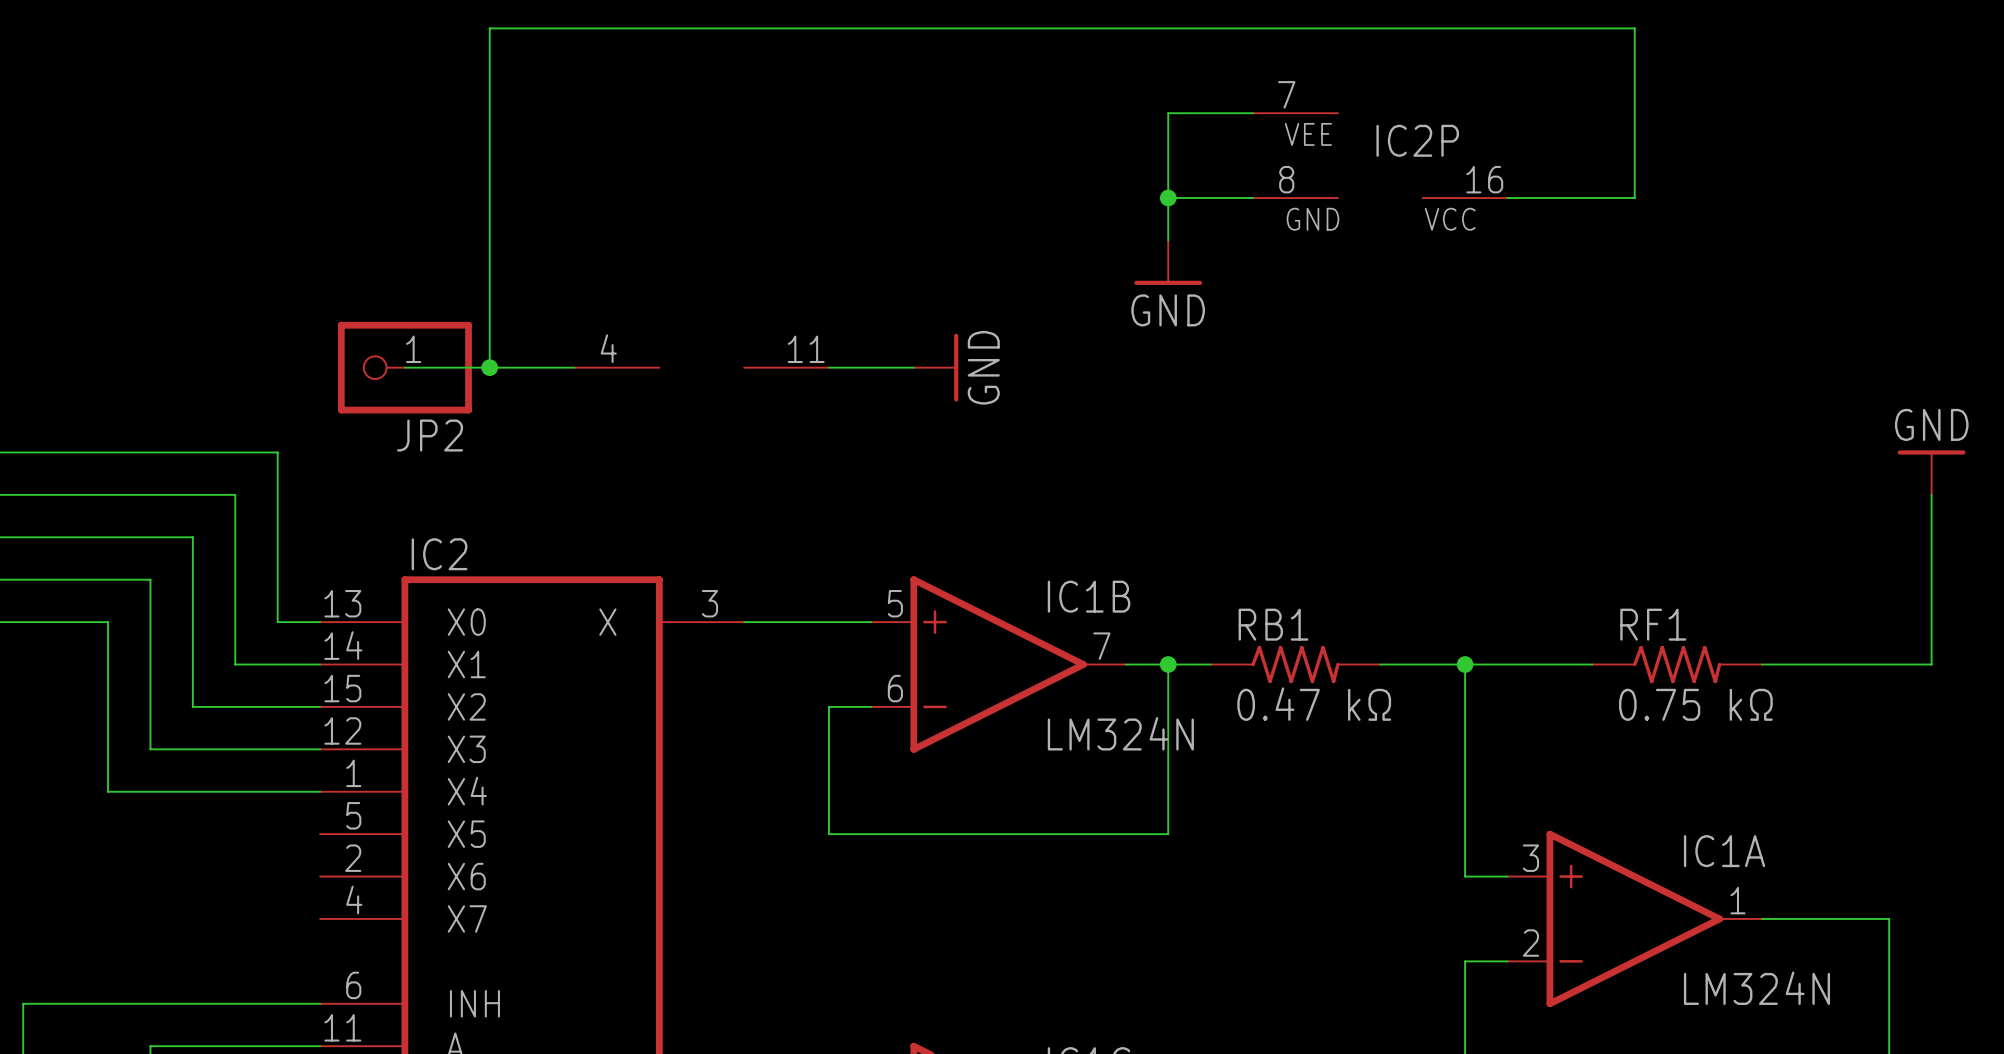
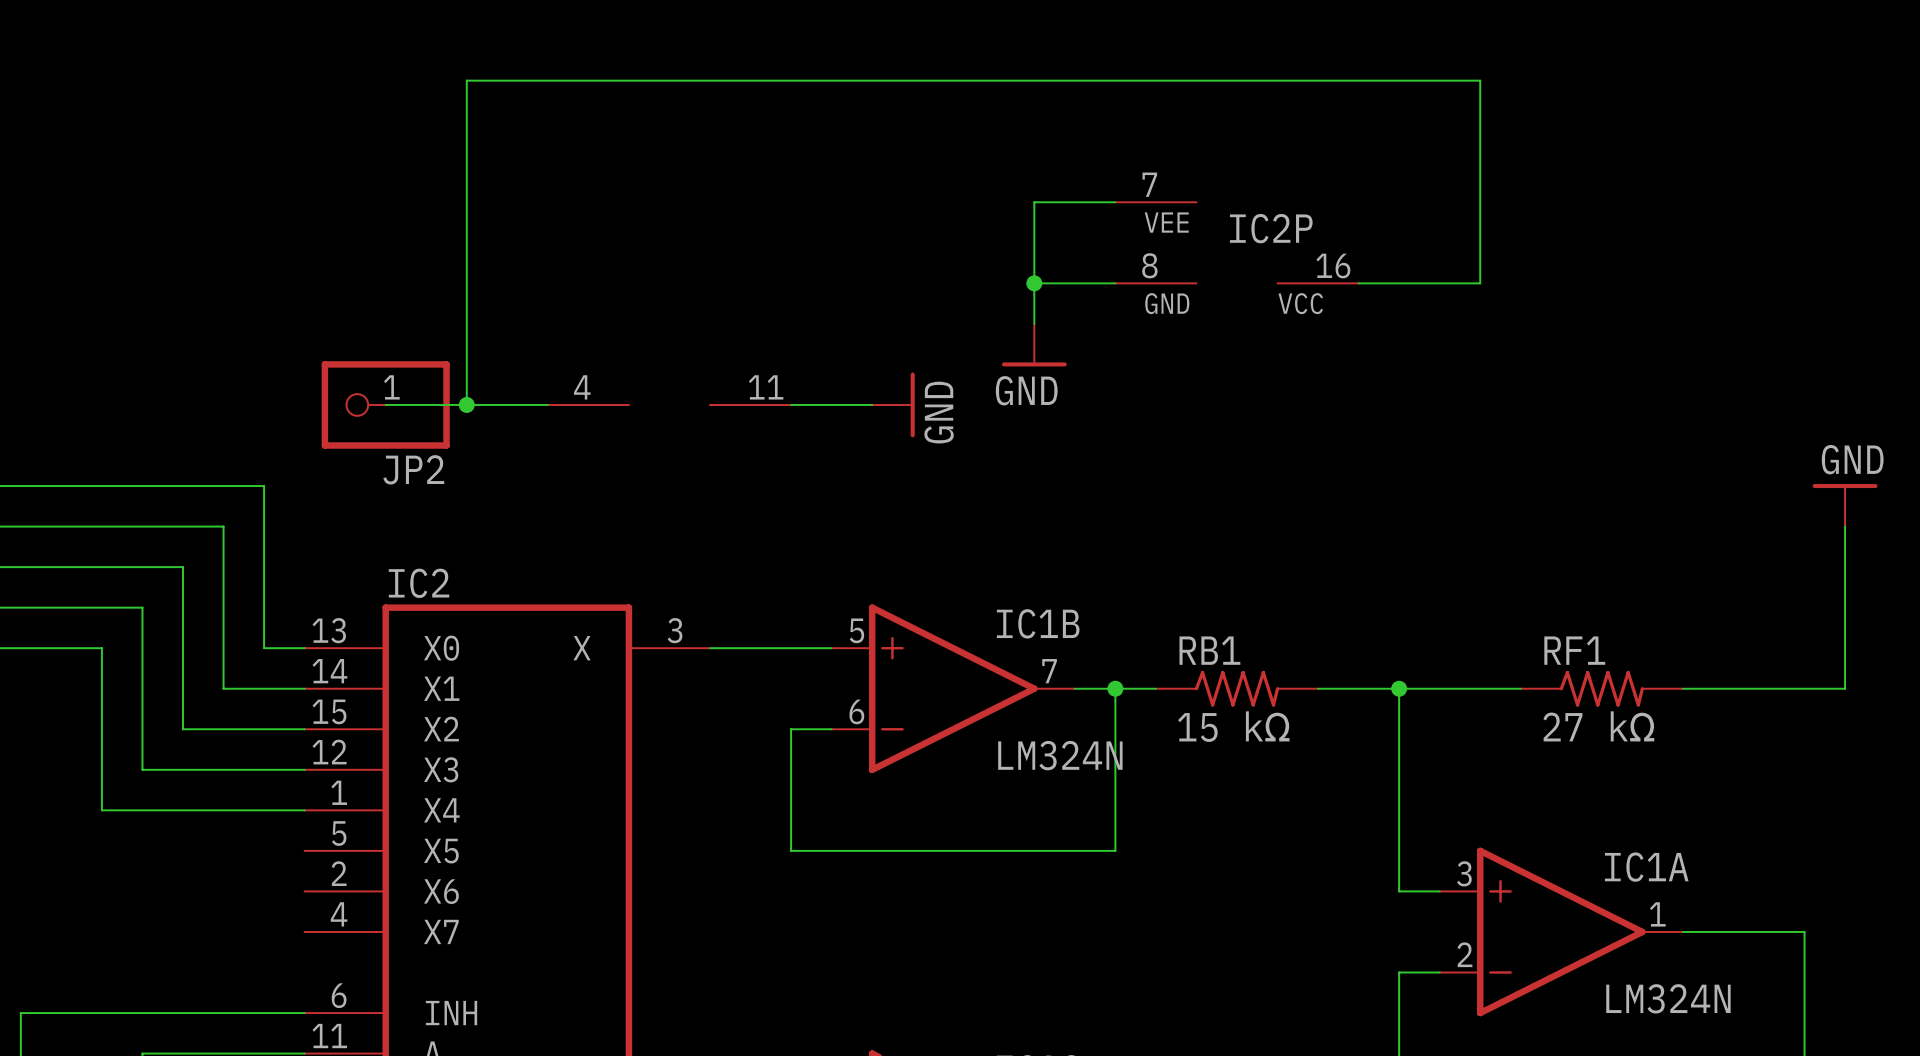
wire: (1549, 28) (1634, 28) (1634, 198) (1507, 198) -> (1480, 80) (1480, 283) (1358, 283)
wire: (1253, 113) (1168, 113) (1168, 240) -> (1034, 283) (1115, 283)
wire: none -> (1115, 202) (1034, 202) (1034, 323)
IC2P position: (1380, 155) -> (1237, 242)
wire: (1168, 198) (1253, 198) -> none
junction position: (1168, 198) -> (1034, 283)
power symbol position: GND (1168, 262) -> GND (1034, 345)
RB1 value: 0.47 kΩ (1314, 704) -> 15 kΩ (1233, 726)
RF1 value: 0.75 kΩ (1695, 704) -> 27 kΩ (1598, 726)

